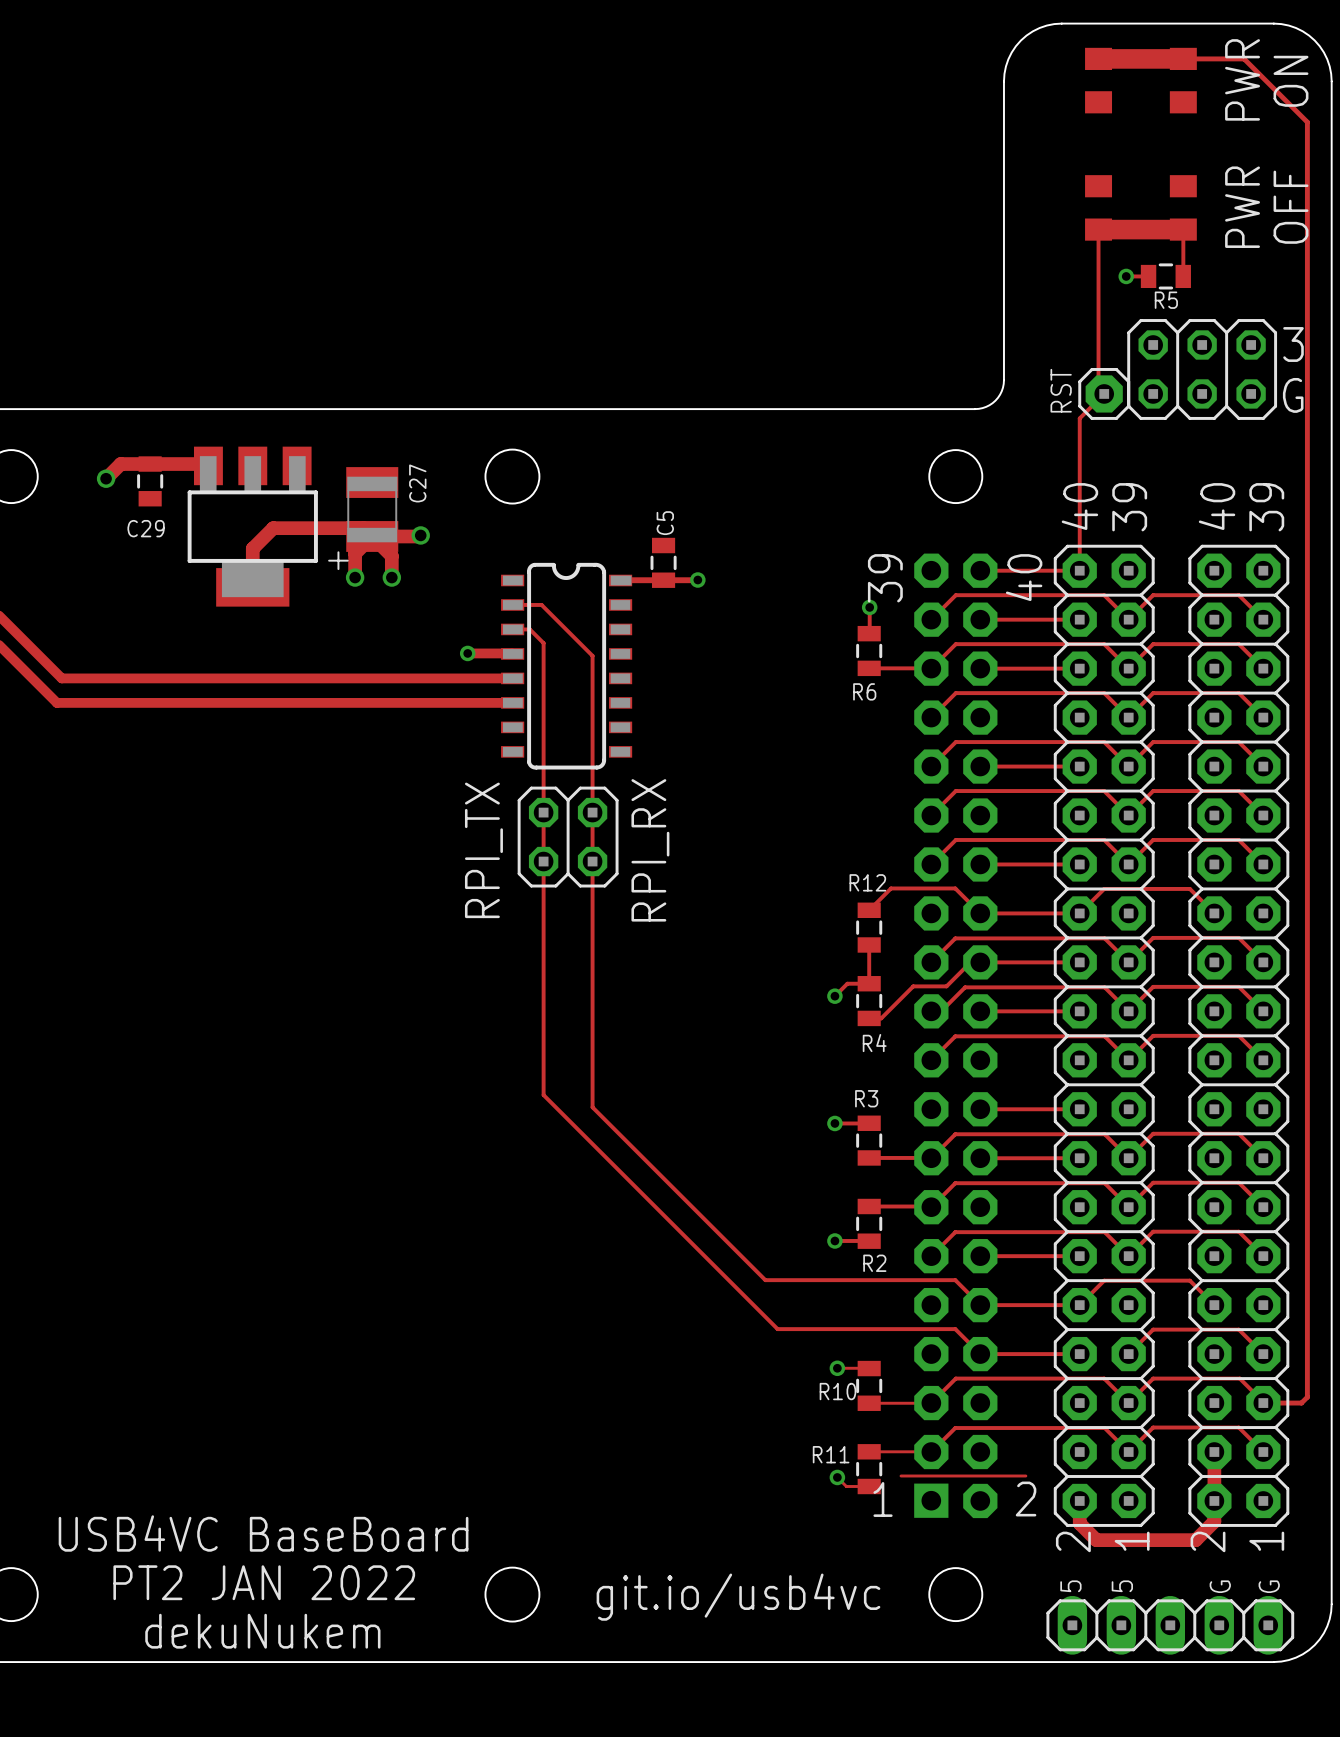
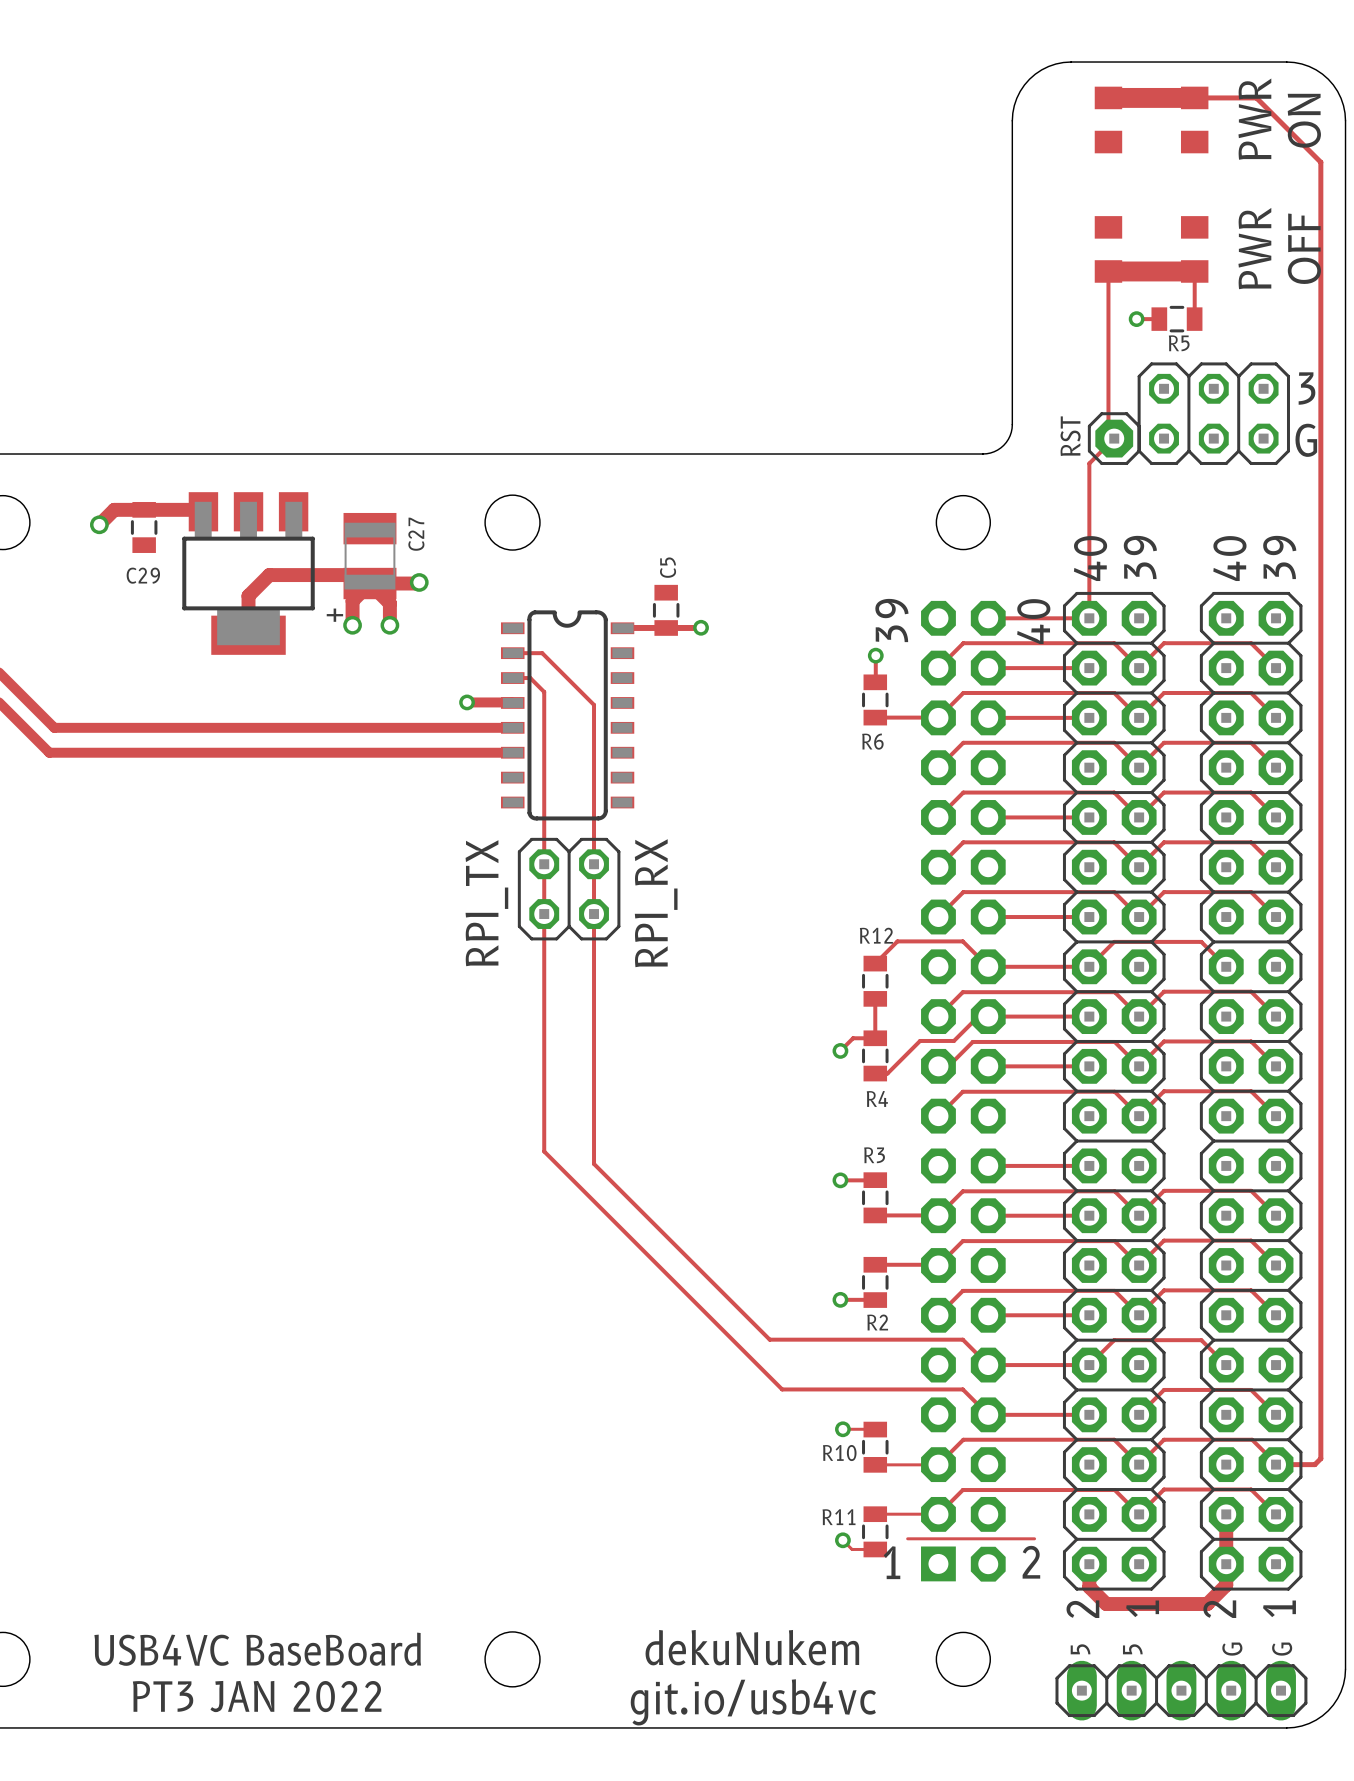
text: USB4VC BaseBoard (263, 1533) -> none
text: PT2 JAN 2022 (264, 1582) -> USB4VC BaseBoard (257, 1649)
text: git.io/usb4vc (738, 1597) -> dekuNukem (752, 1647)
text: dekuNukem (262, 1631) -> PT3 JAN 2022 (257, 1696)
text: none -> git.io/usb4vc (753, 1702)

